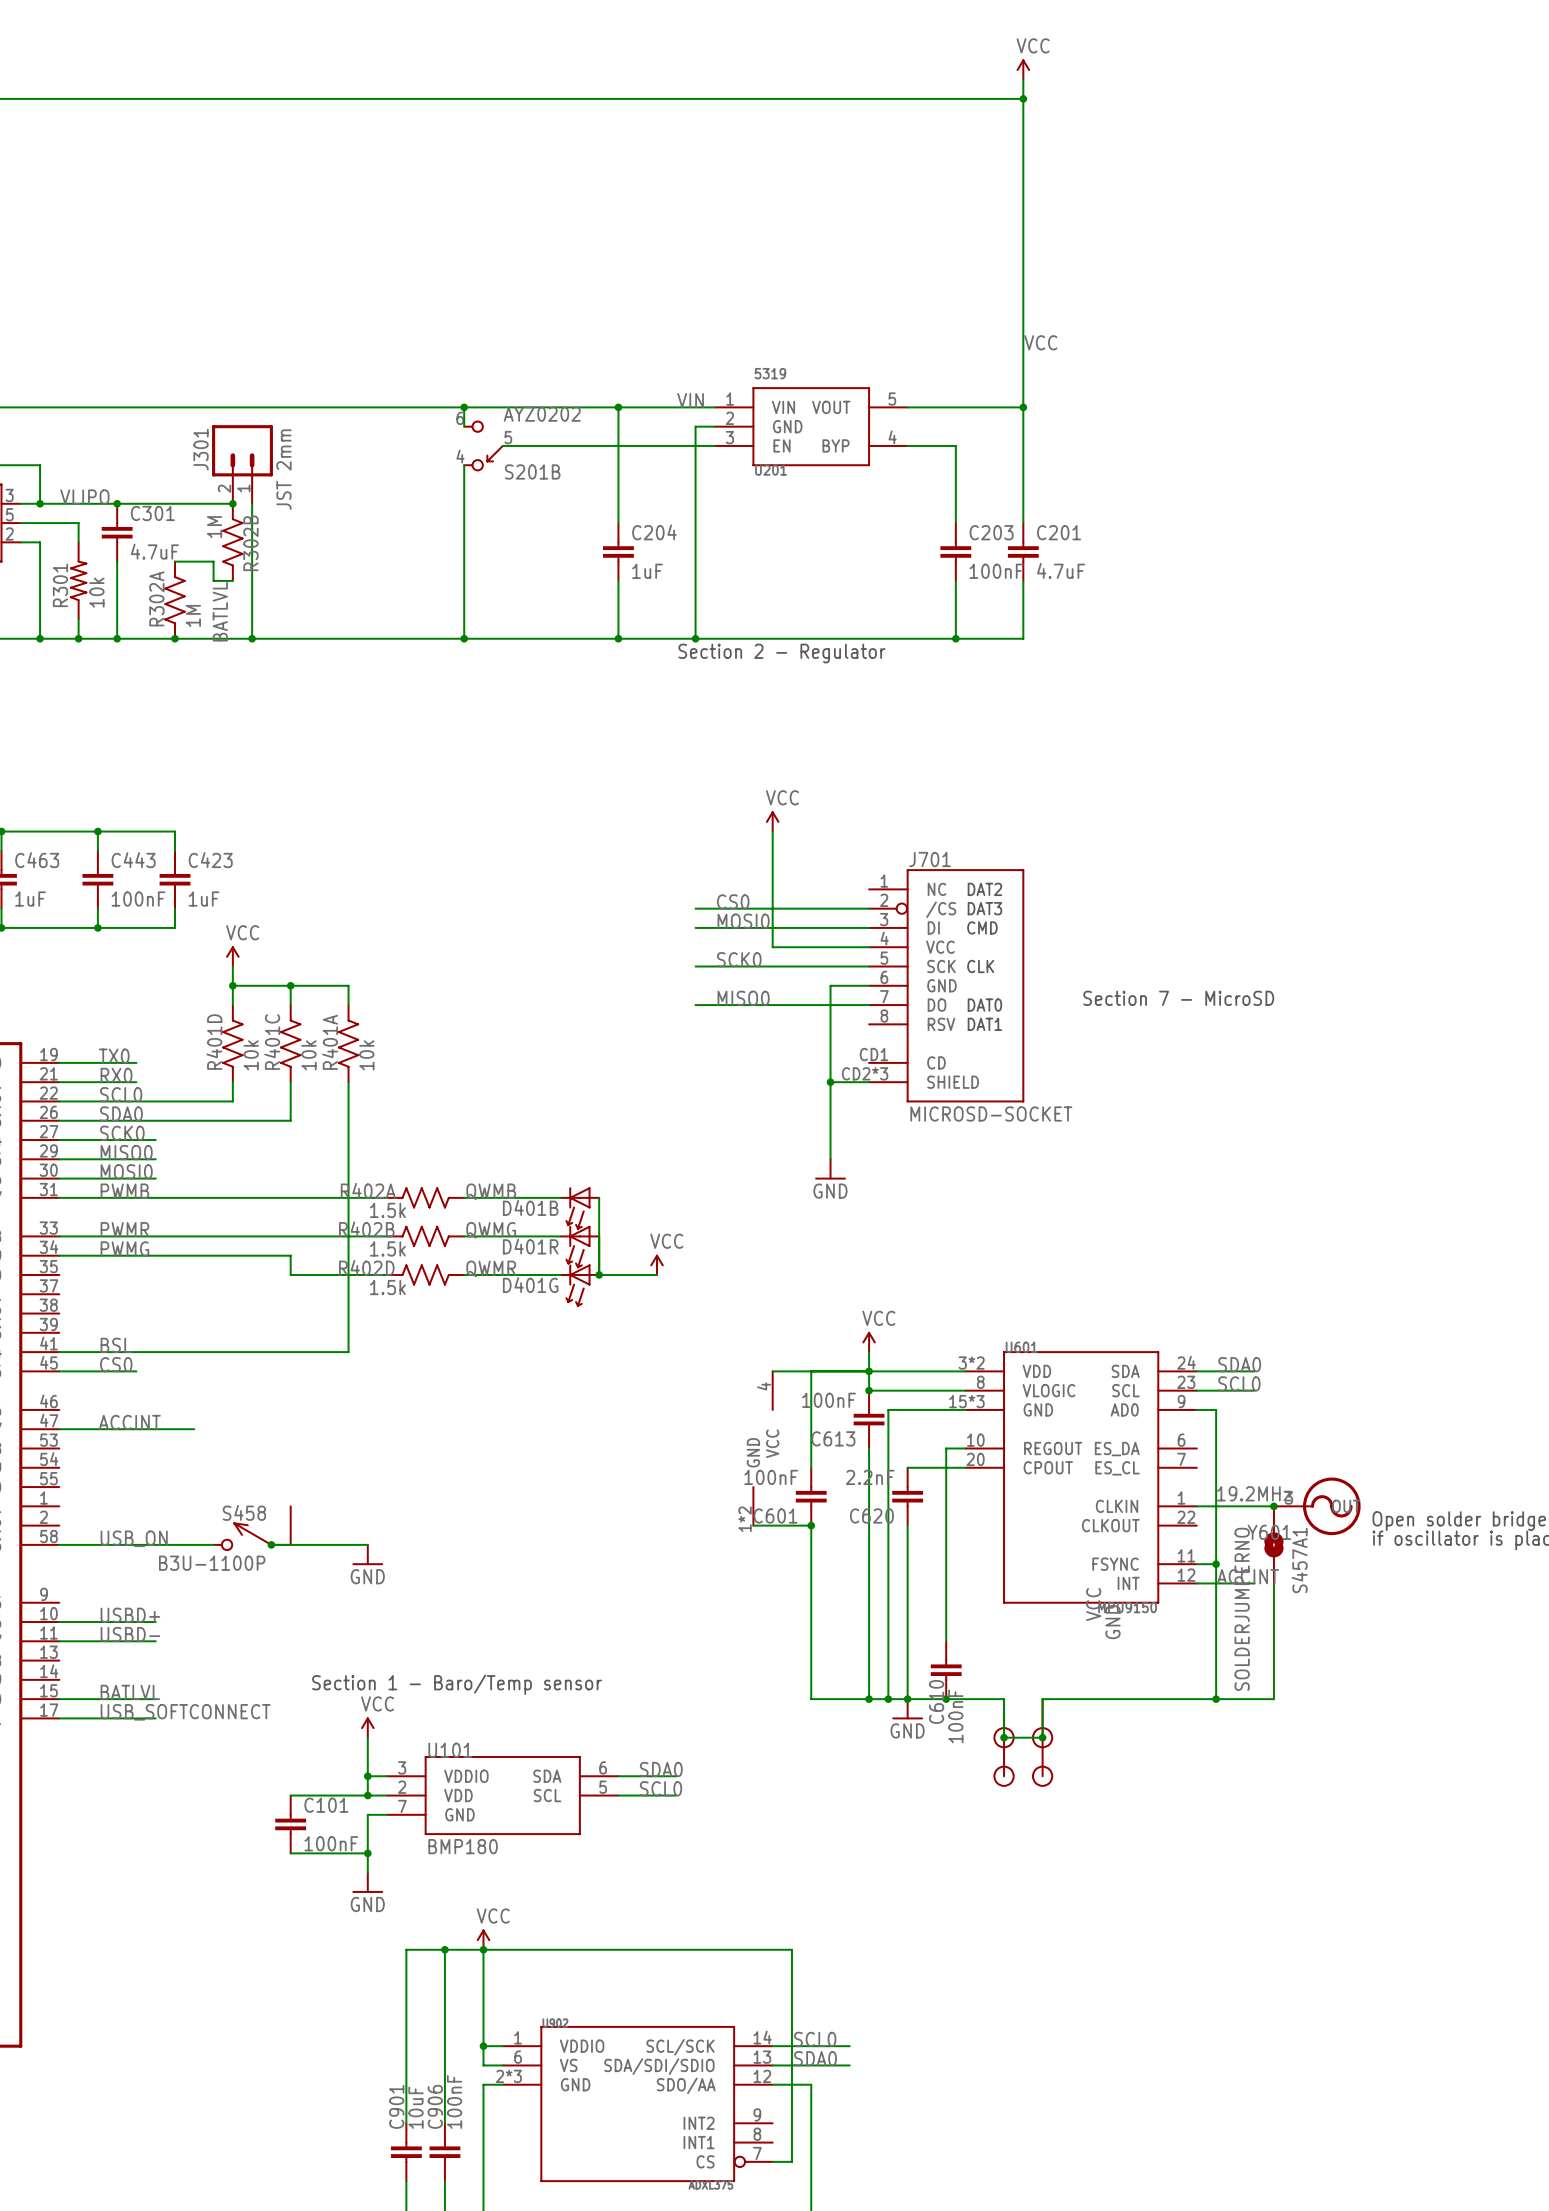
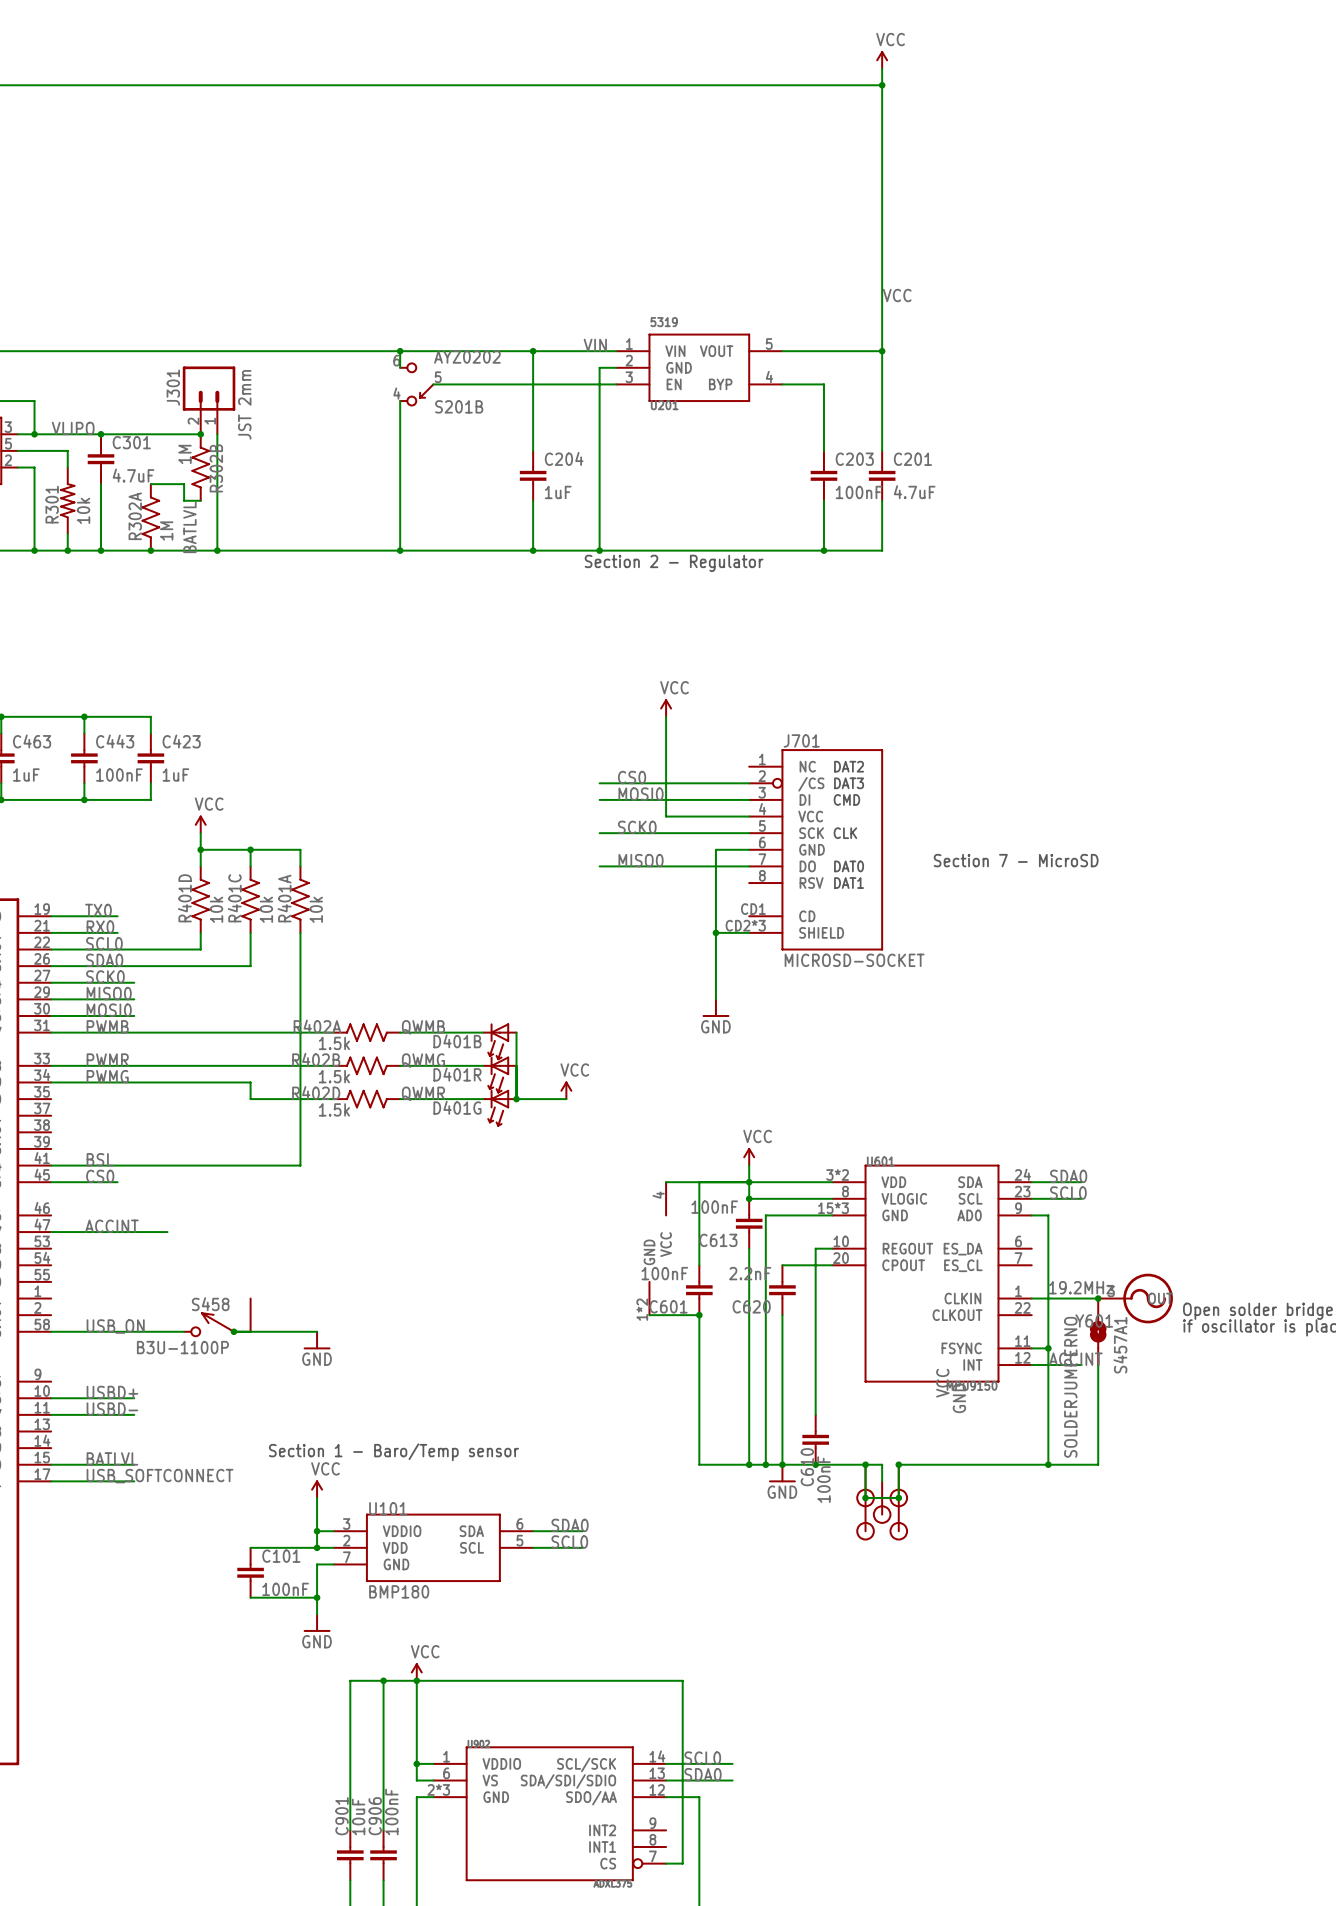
wire: none -> (865, 1464) (882, 1464) (882, 1481)
junction: none -> (865, 1464)
junction: none -> (898, 1464)
part: none -> (882, 1502)

